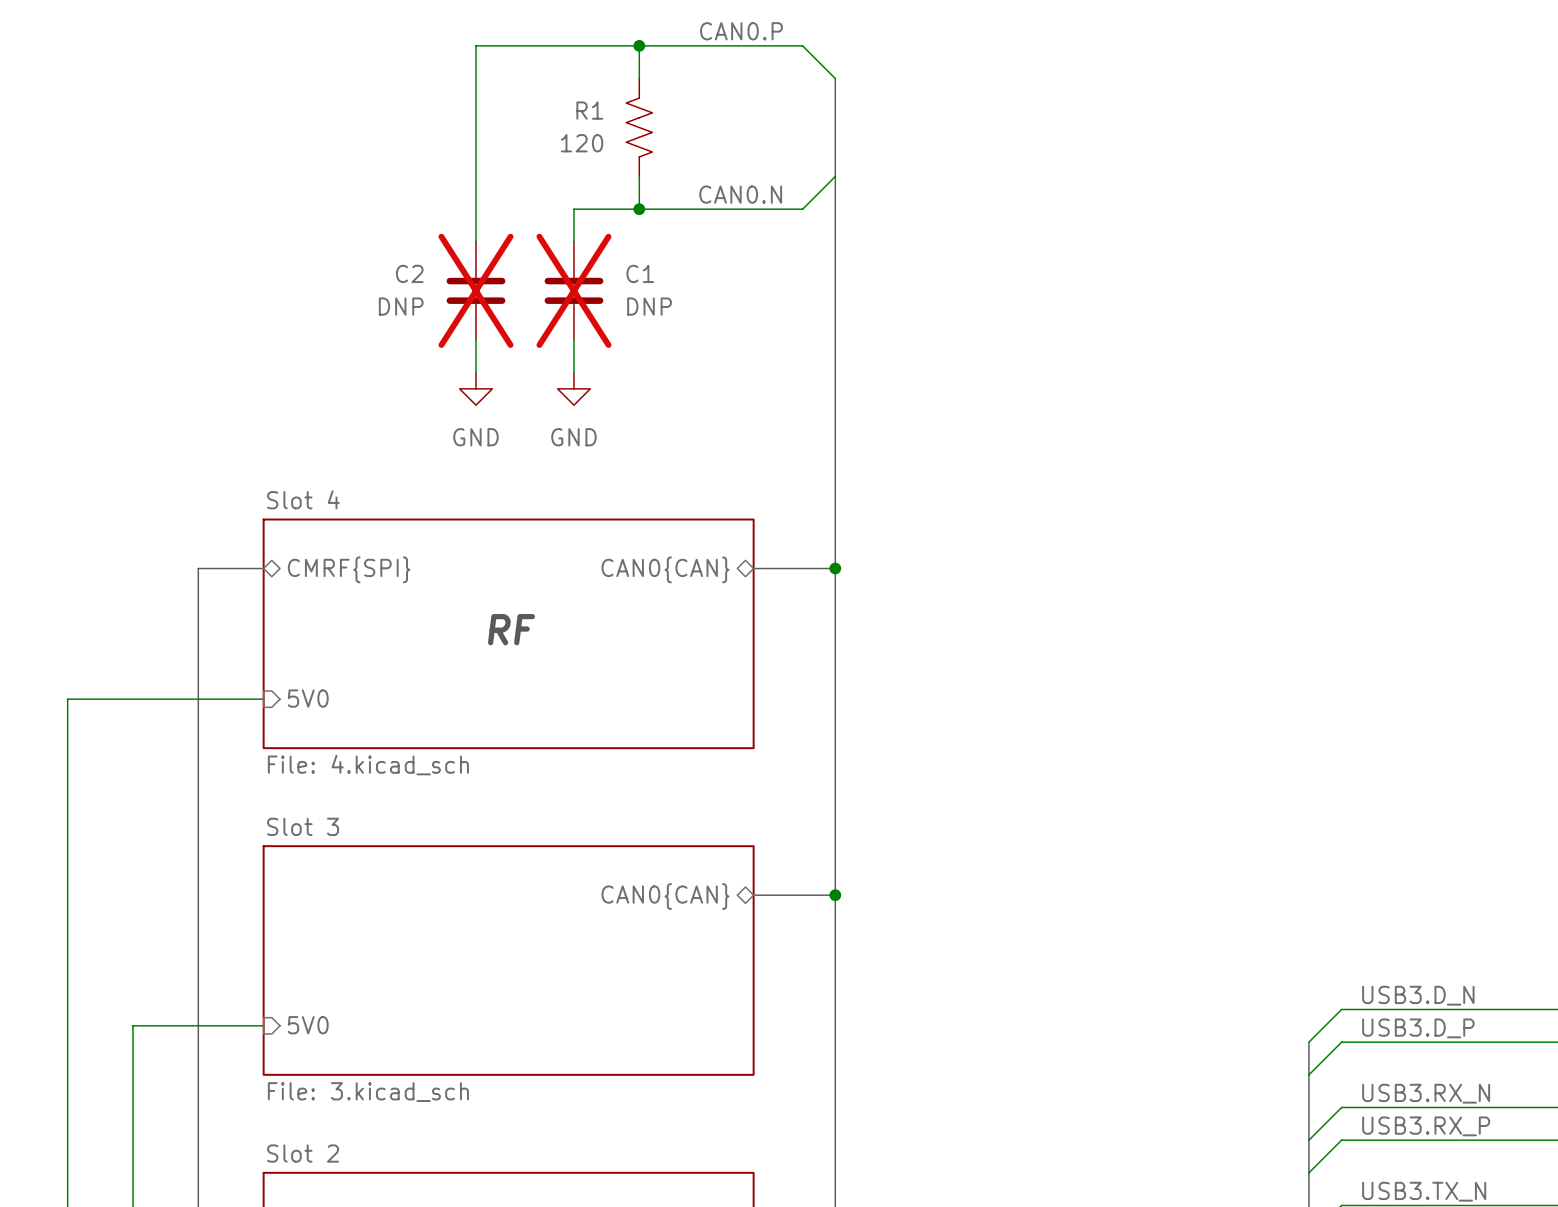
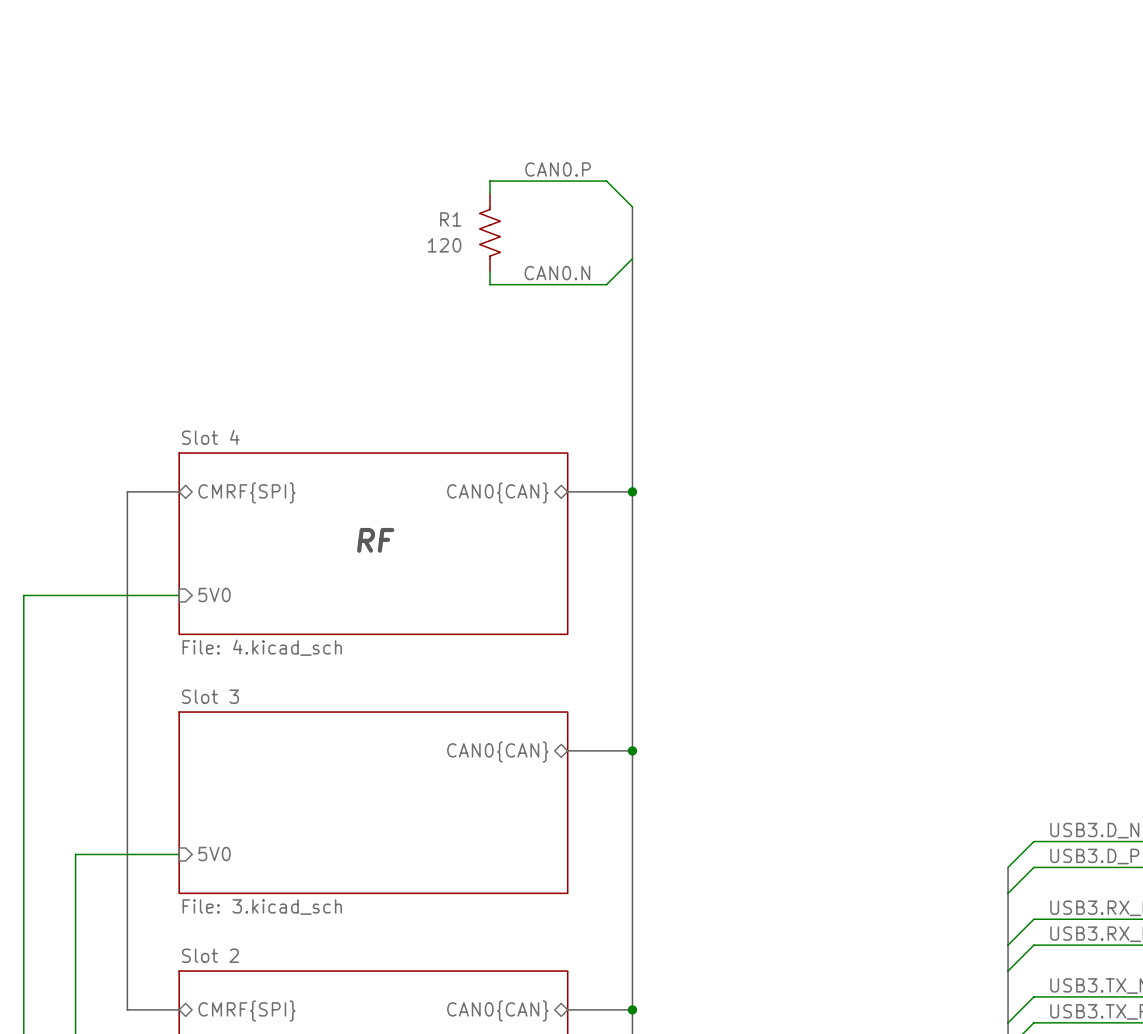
label position: CAN0.P (741, 31) -> CAN0.P (558, 169)
wire: (639, 45) (639, 78) -> none
junction: (639, 45) -> none
wire: (835, 78) (802, 45) (475, 45) (475, 241) -> none
bus: (835, 78) (835, 209) -> none
R1 position: (639, 127) -> (490, 232)
wire: (639, 176) (639, 209) -> none
wire: (835, 176) (802, 209) (573, 209) (573, 241) -> none
wire: none -> (490, 194) (490, 181) (606, 181) (632, 206)
label position: CAN0.N (740, 194) -> CAN0.N (557, 273)
junction: (639, 209) -> none
wire: none -> (632, 258) (606, 284) (490, 284) (490, 271)
C2: DNP (475, 290) -> none
C1: DNP (573, 290) -> none
wire: (475, 339) (475, 372) -> none
wire: (573, 339) (573, 372) -> none
power symbol: GND (475, 388) -> none
power symbol: GND (573, 388) -> none

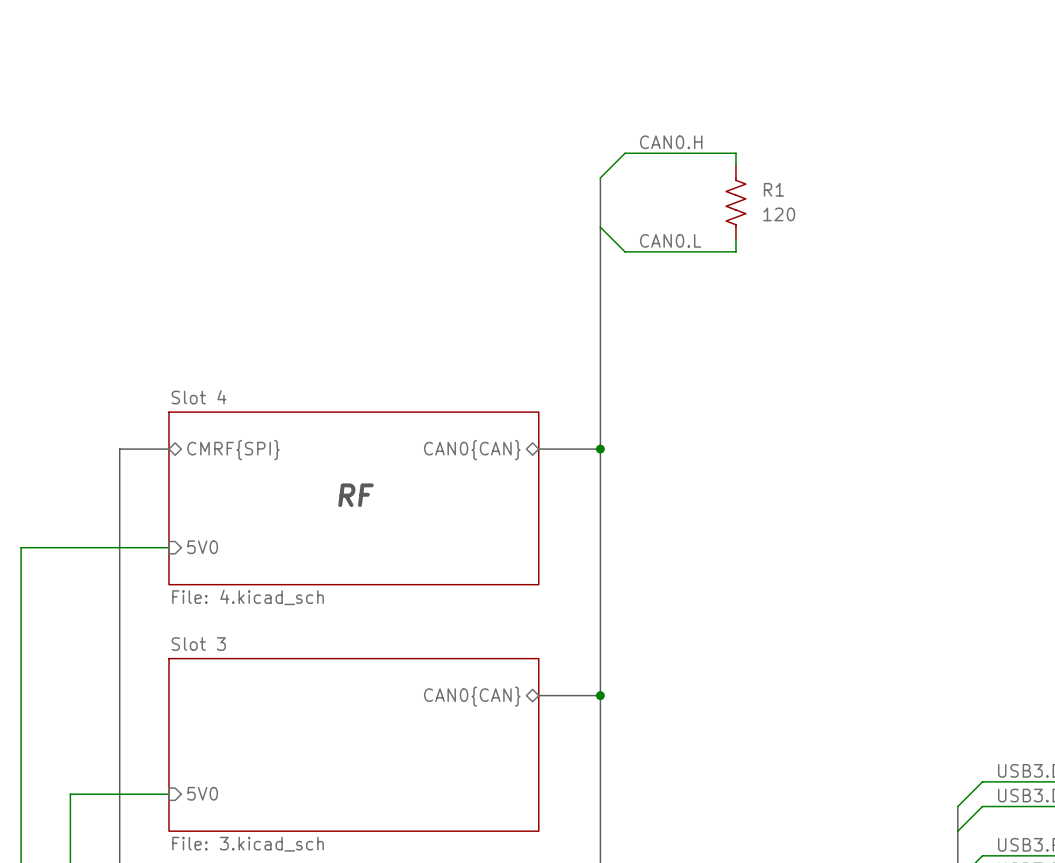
label: CAN0.P (558, 169) -> none
label: none -> CAN0.H (671, 142)
wire: (490, 194) (490, 181) (606, 181) (632, 206) -> (735, 165) (735, 153) (625, 153) (600, 177)
R1 flip: as is (490, 232) -> left-right (735, 202)
R1 position: (490, 232) -> (735, 202)
wire: (632, 258) (606, 284) (490, 284) (490, 271) -> (600, 227) (625, 251) (735, 251) (735, 239)
label: CAN0.N (557, 273) -> none
label: none -> CAN0.L (670, 240)

